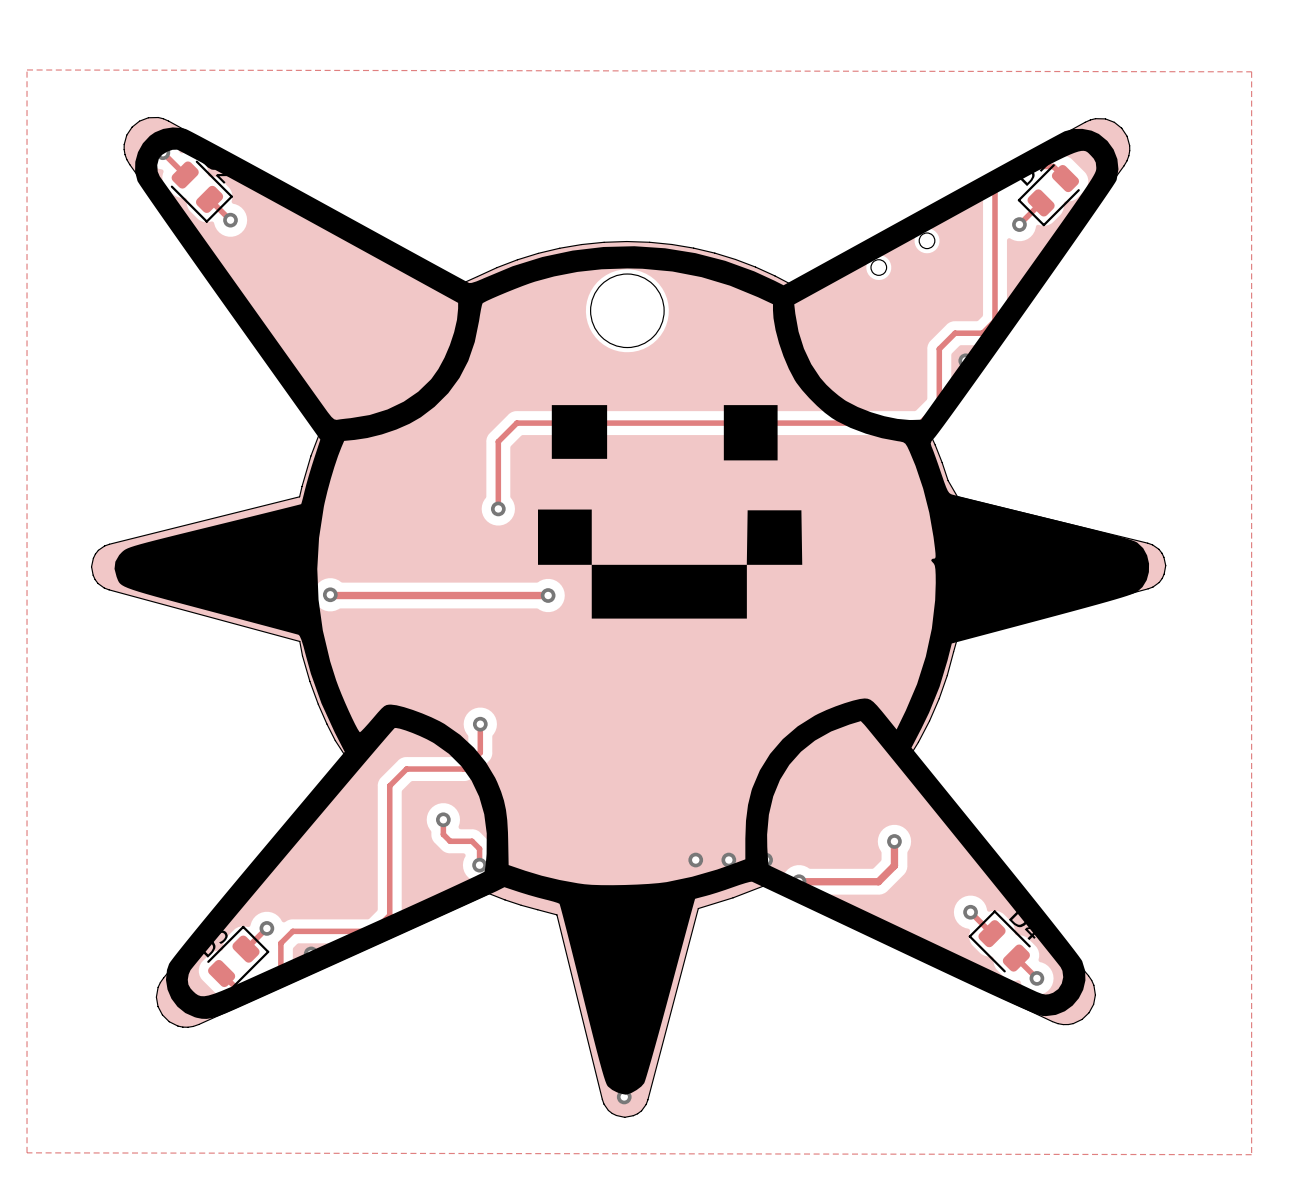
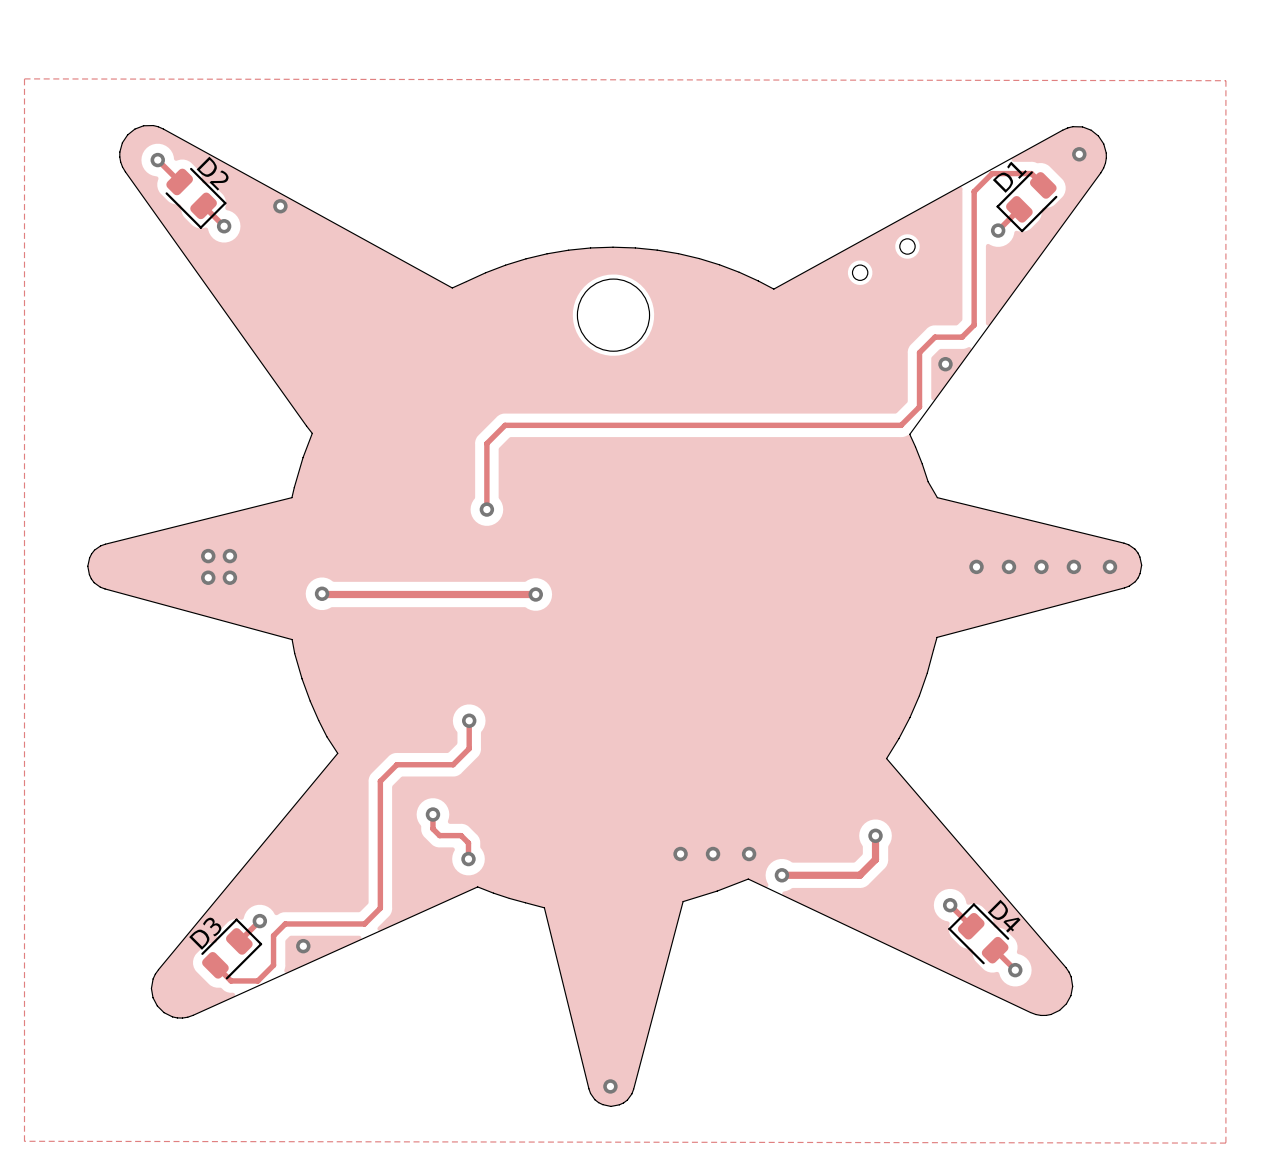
drawing: [114, 127, 1150, 1095] -> none

